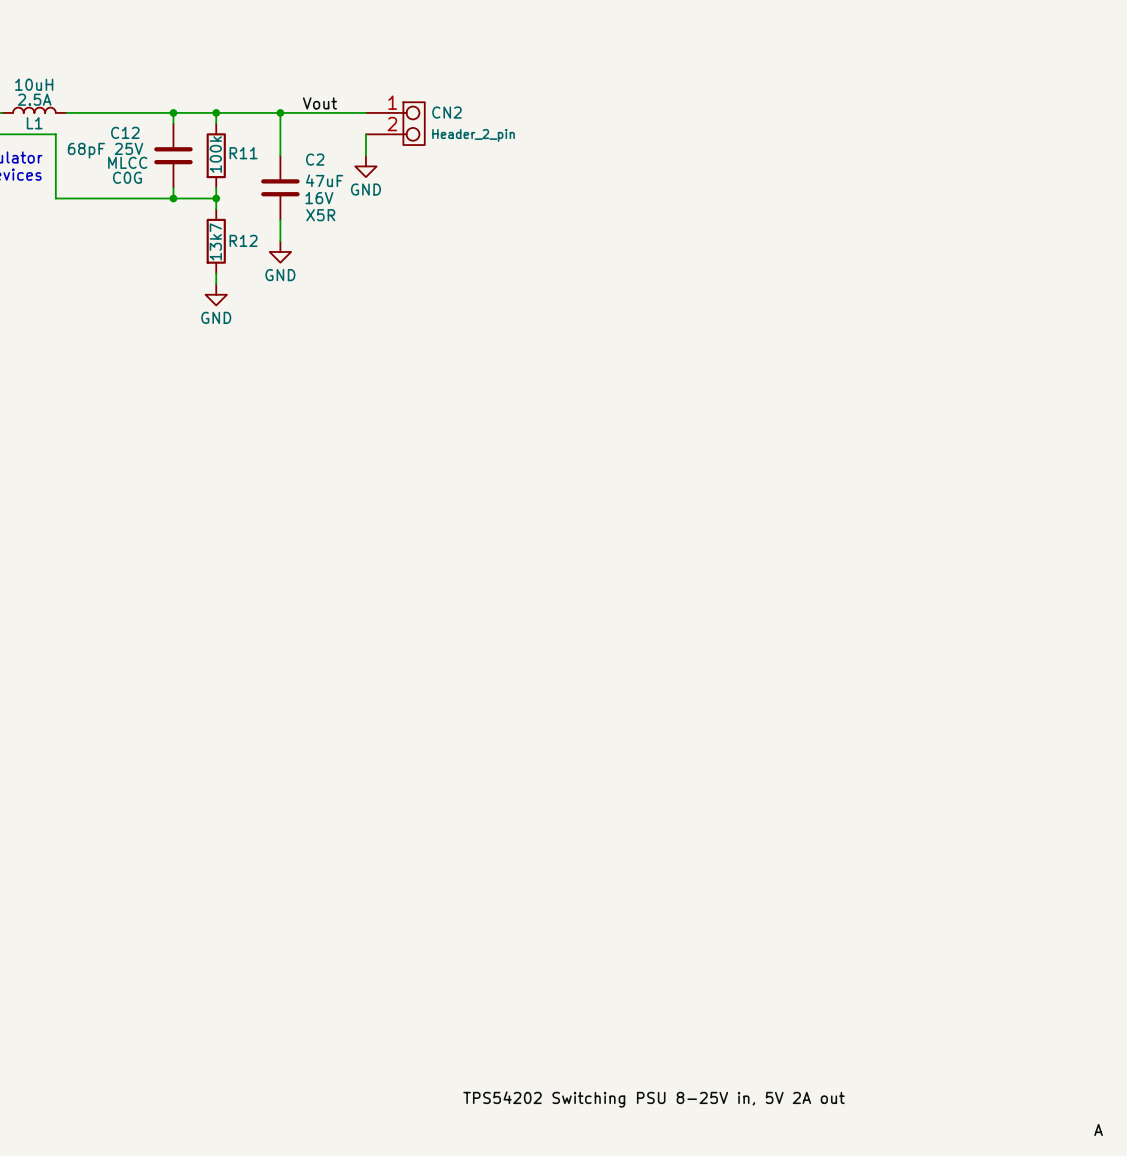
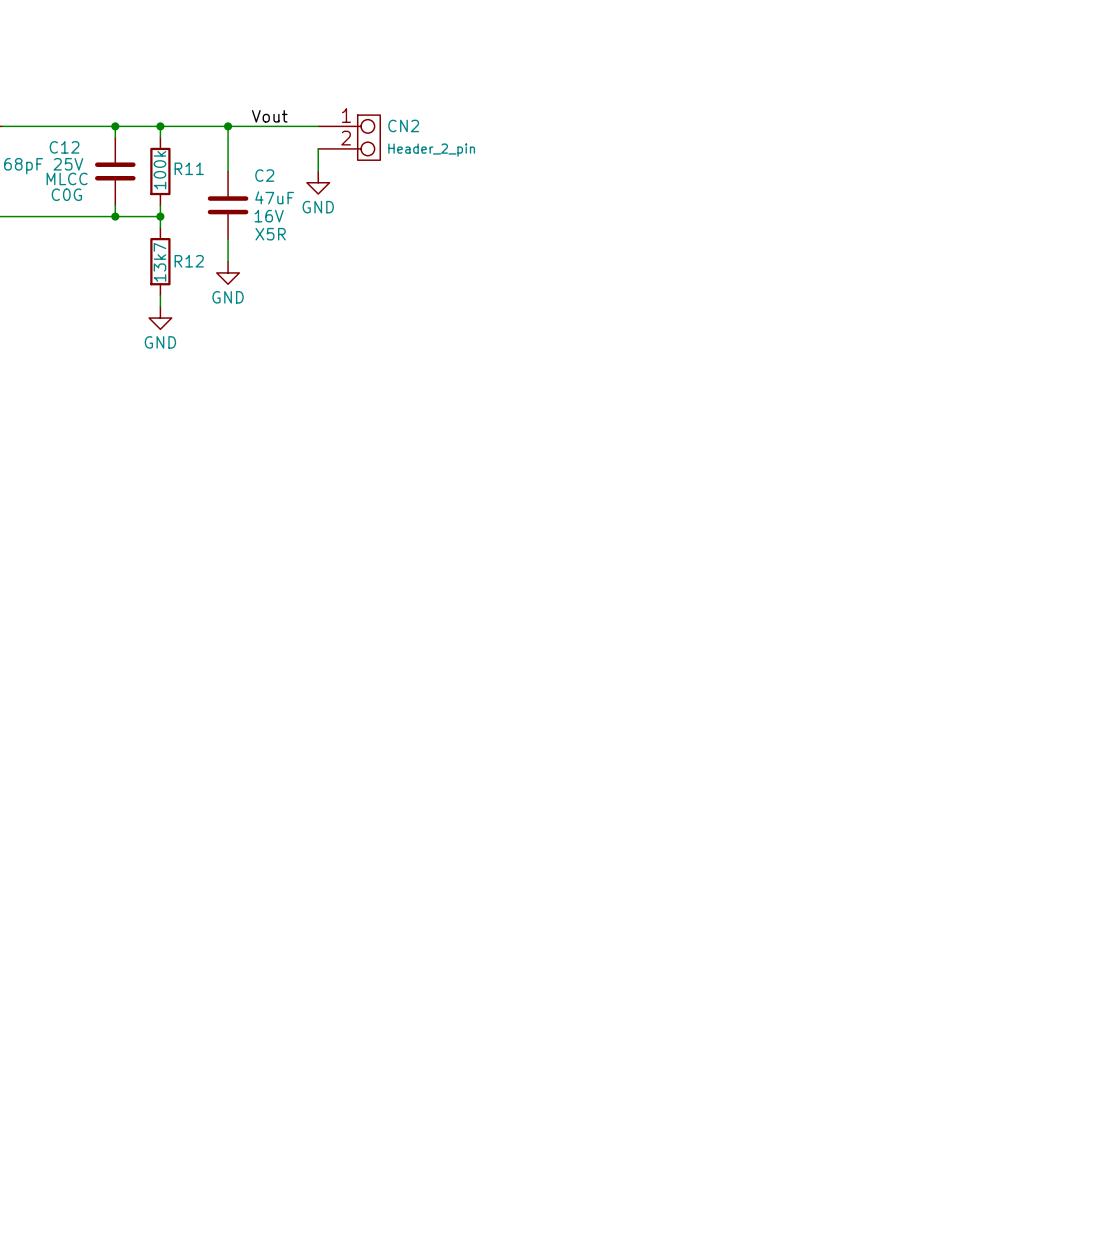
label: TPS54202 Switching PSU 8-25V in, 5V 2A out (654, 1099) -> none
label: A (1098, 1130) -> none

